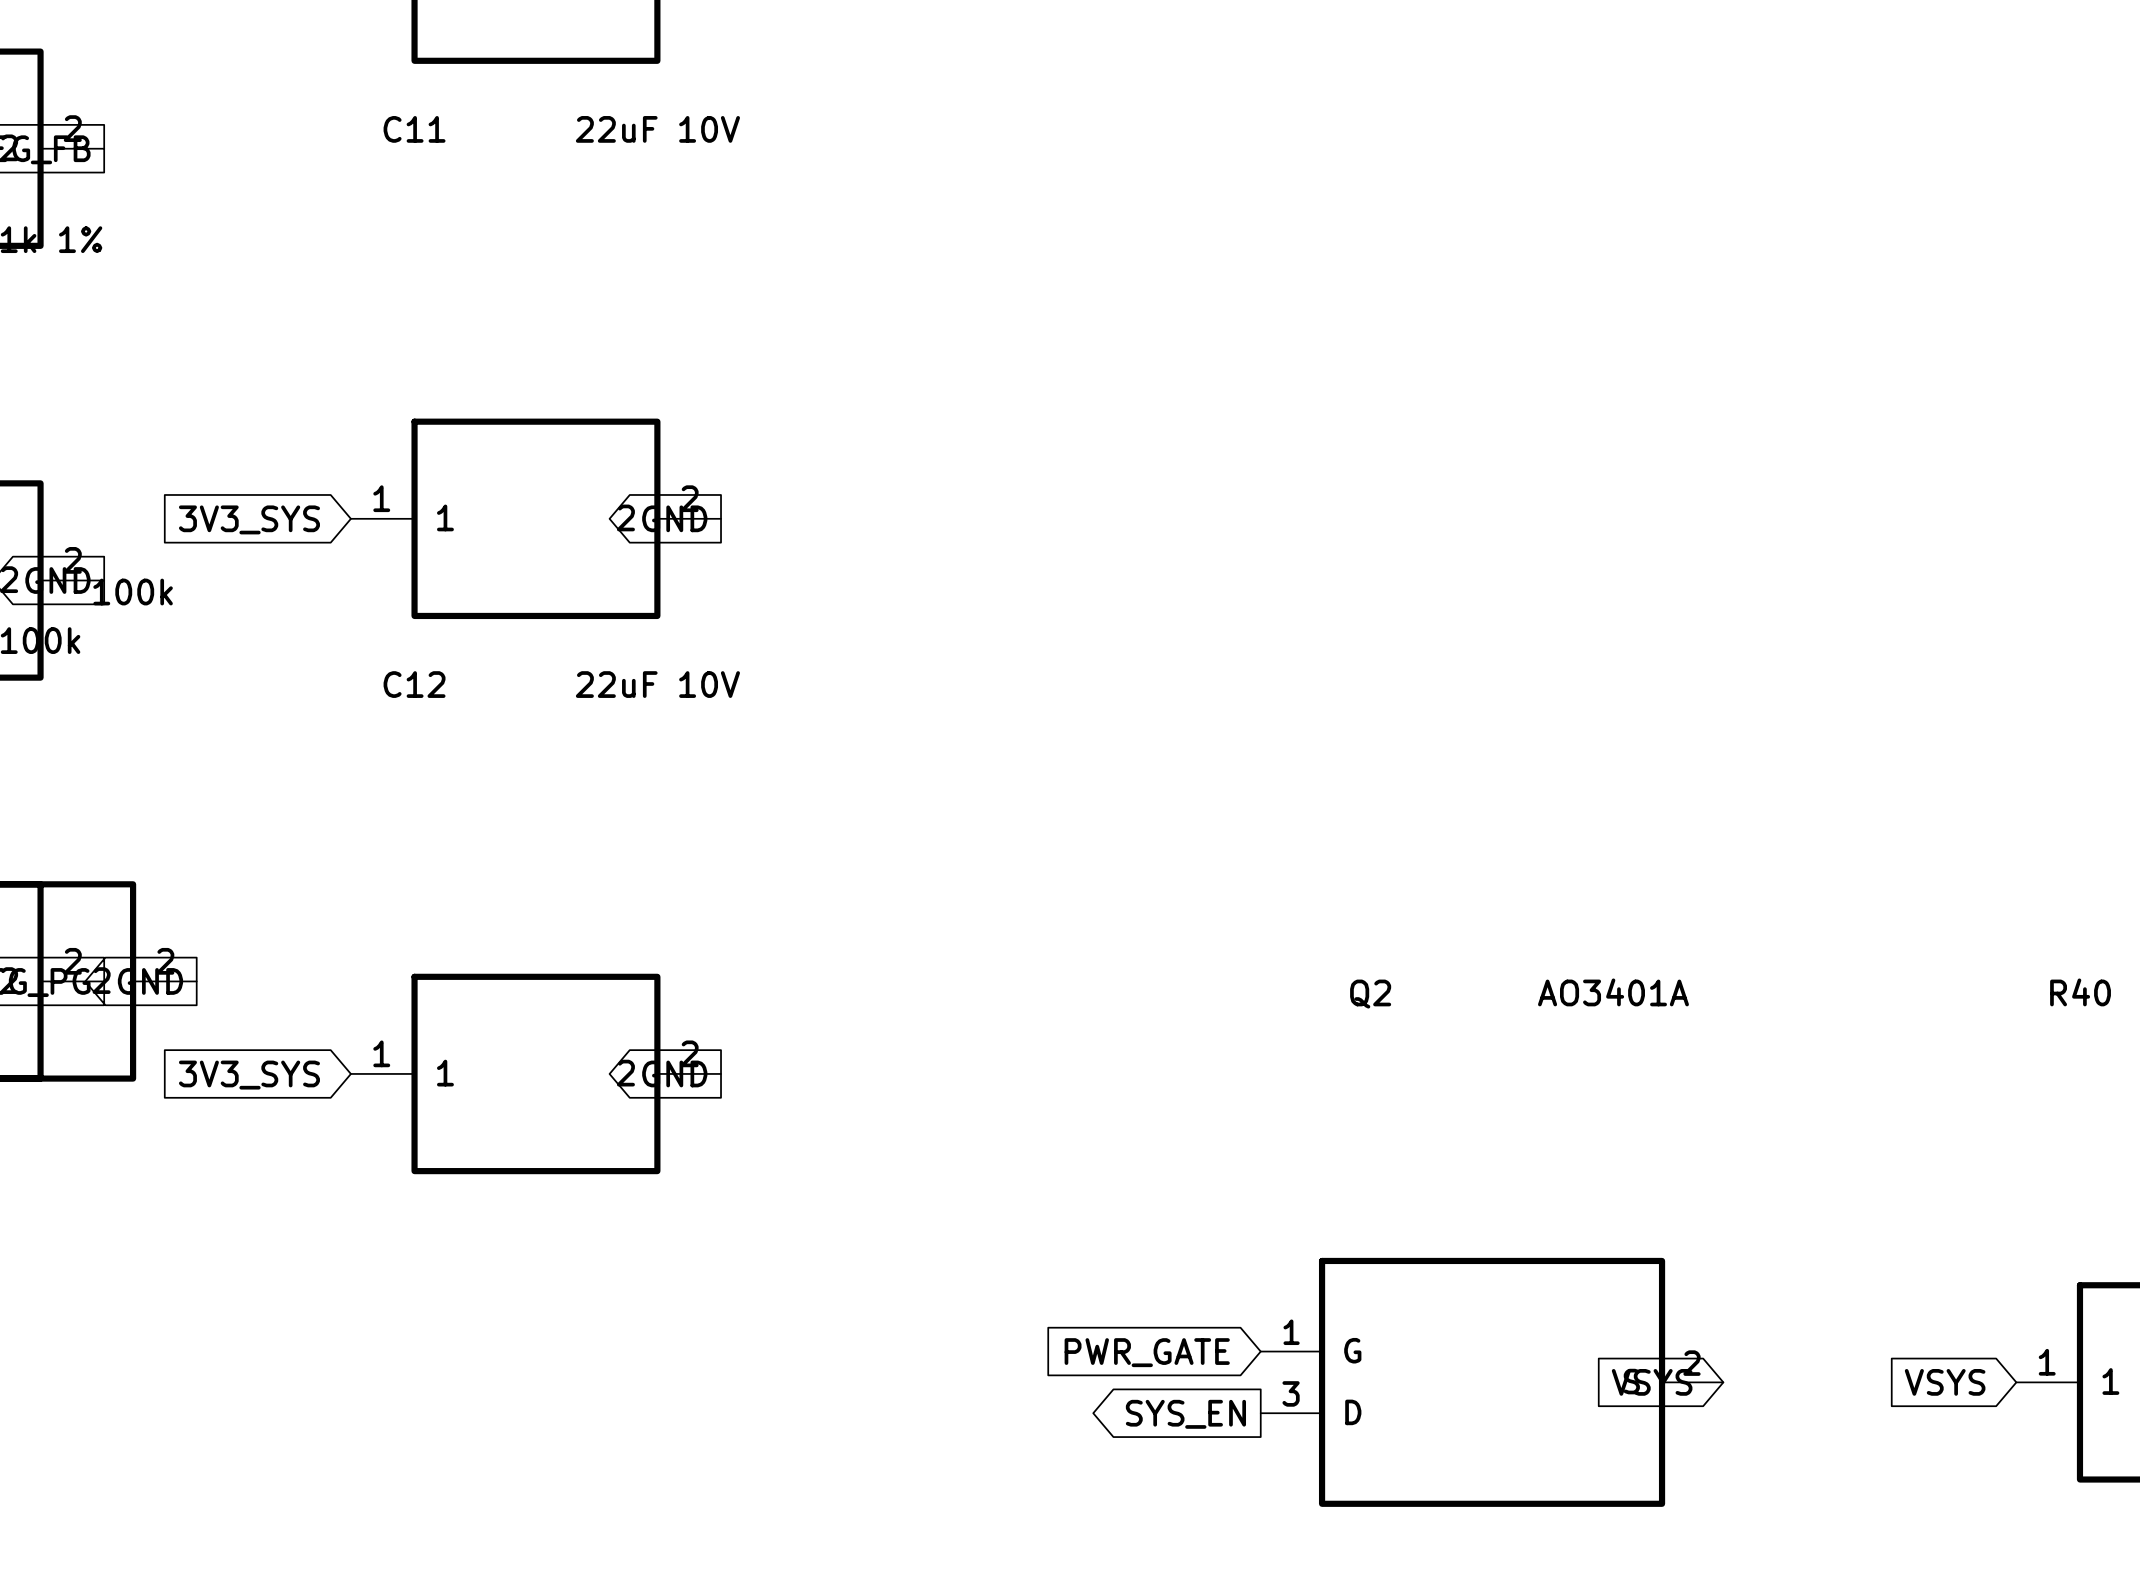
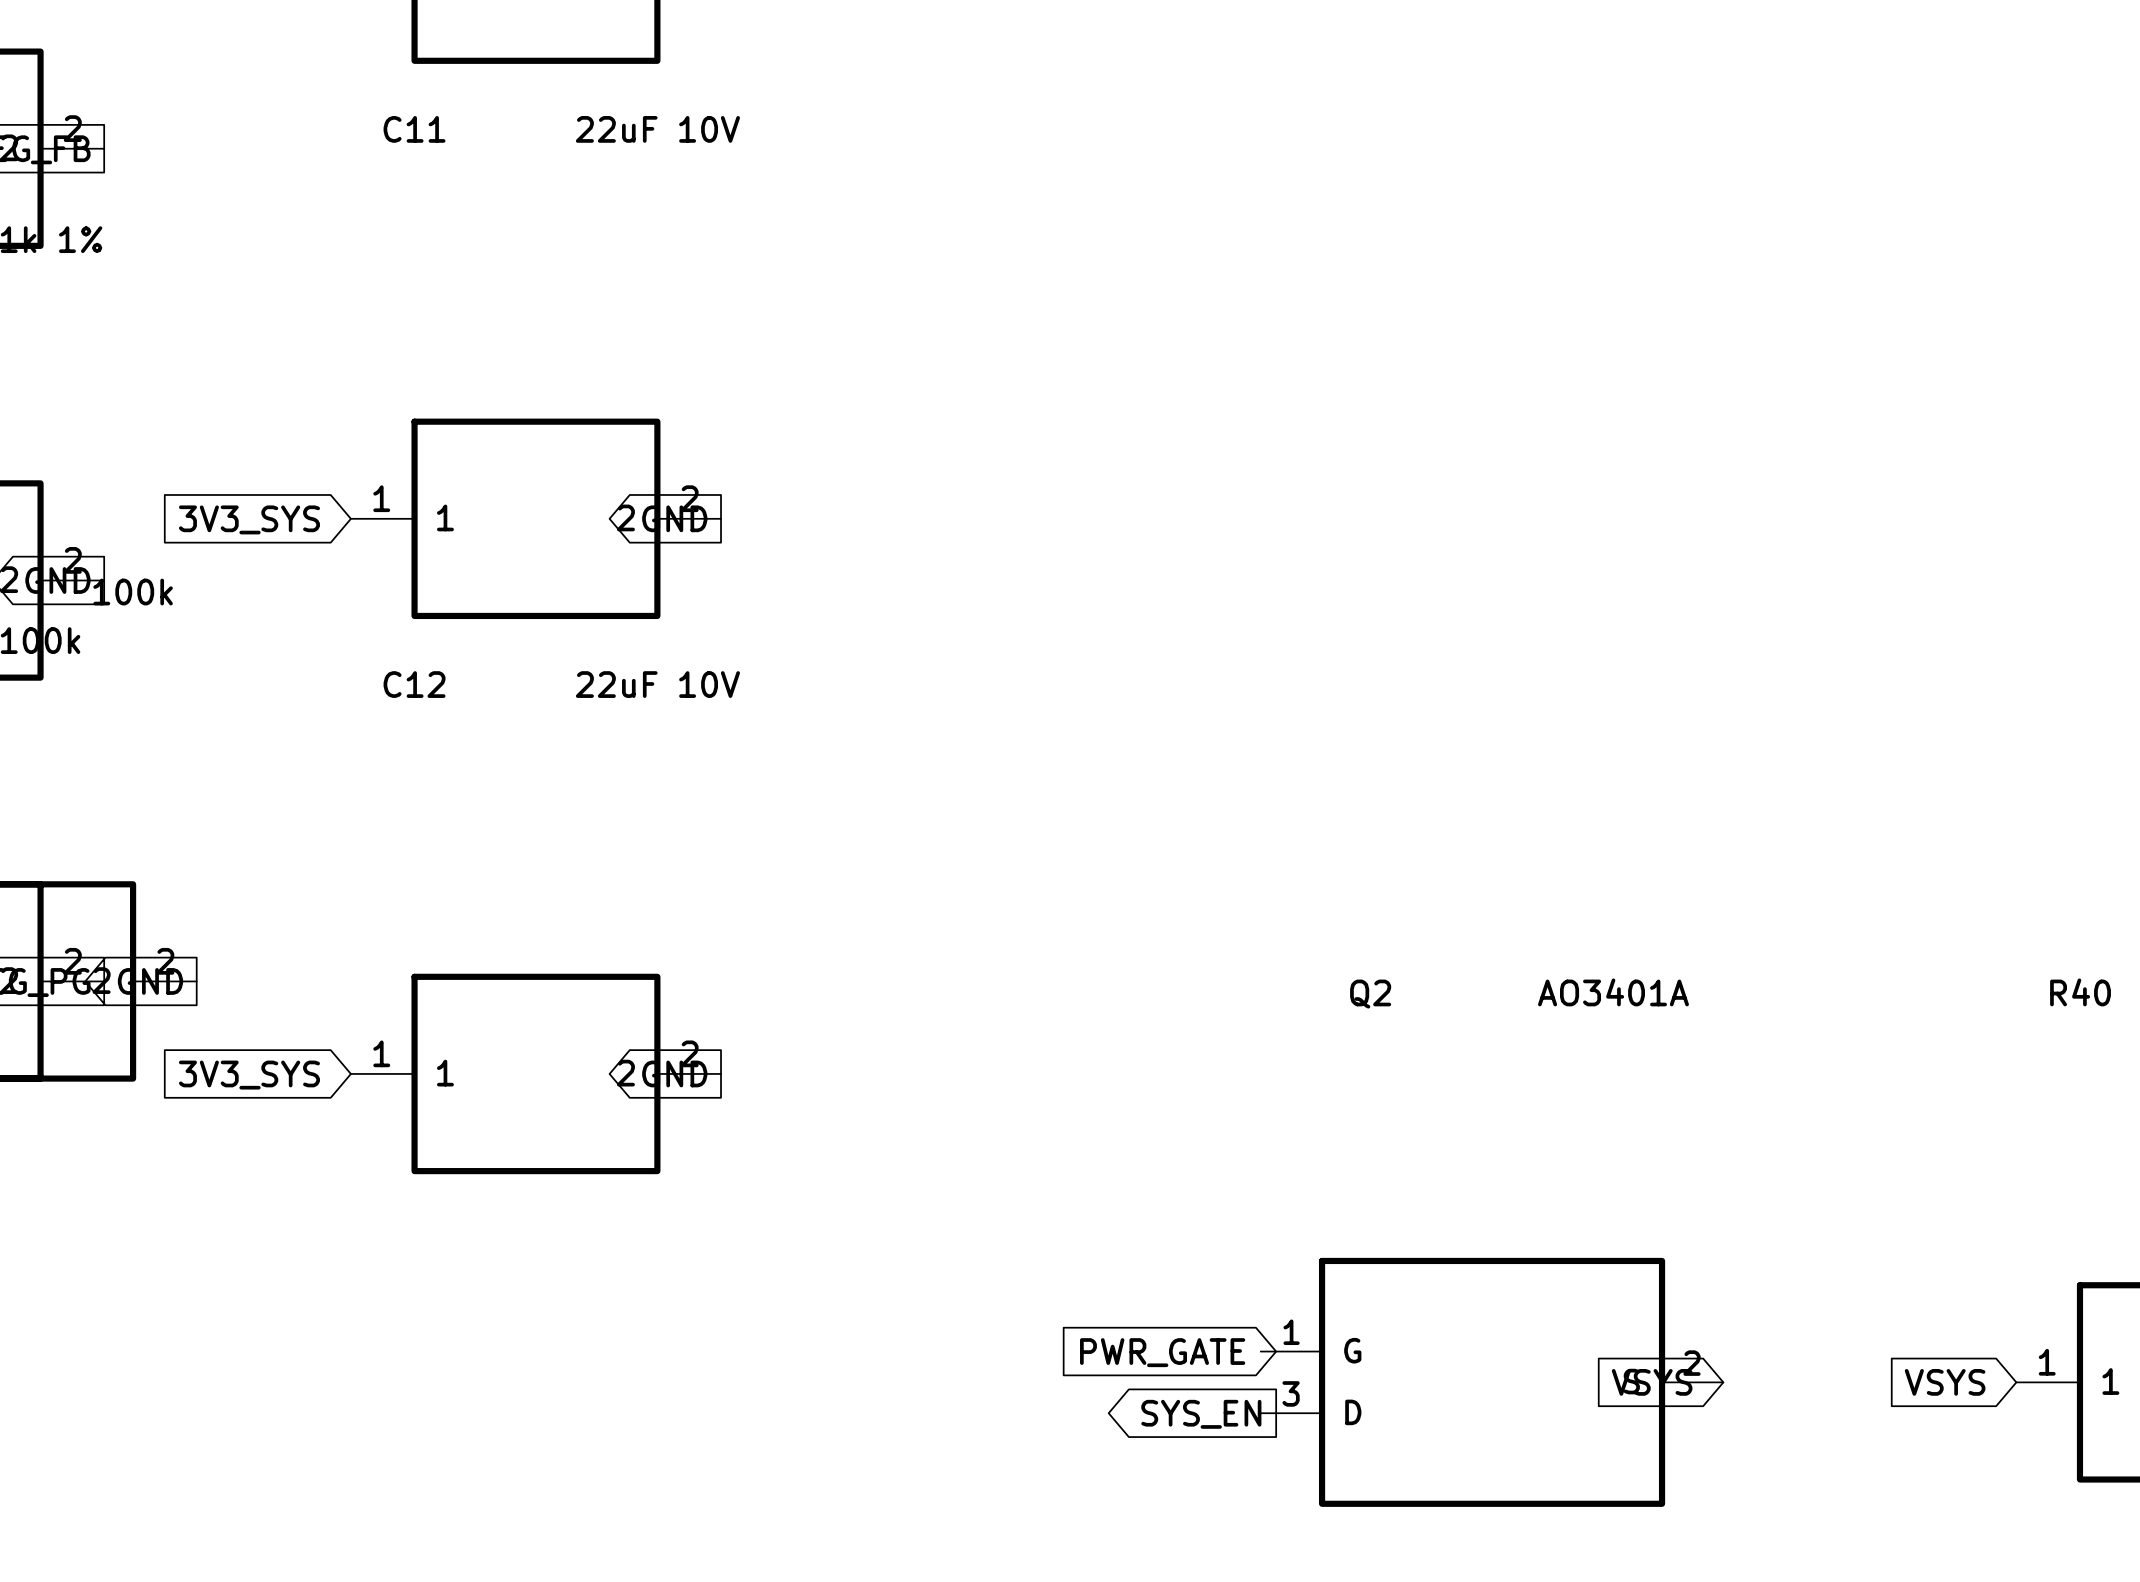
global label position: PWR_GATE (1147, 1352) -> PWR_GATE (1162, 1352)
global label position: SYS_EN (1185, 1414) -> SYS_EN (1201, 1414)

